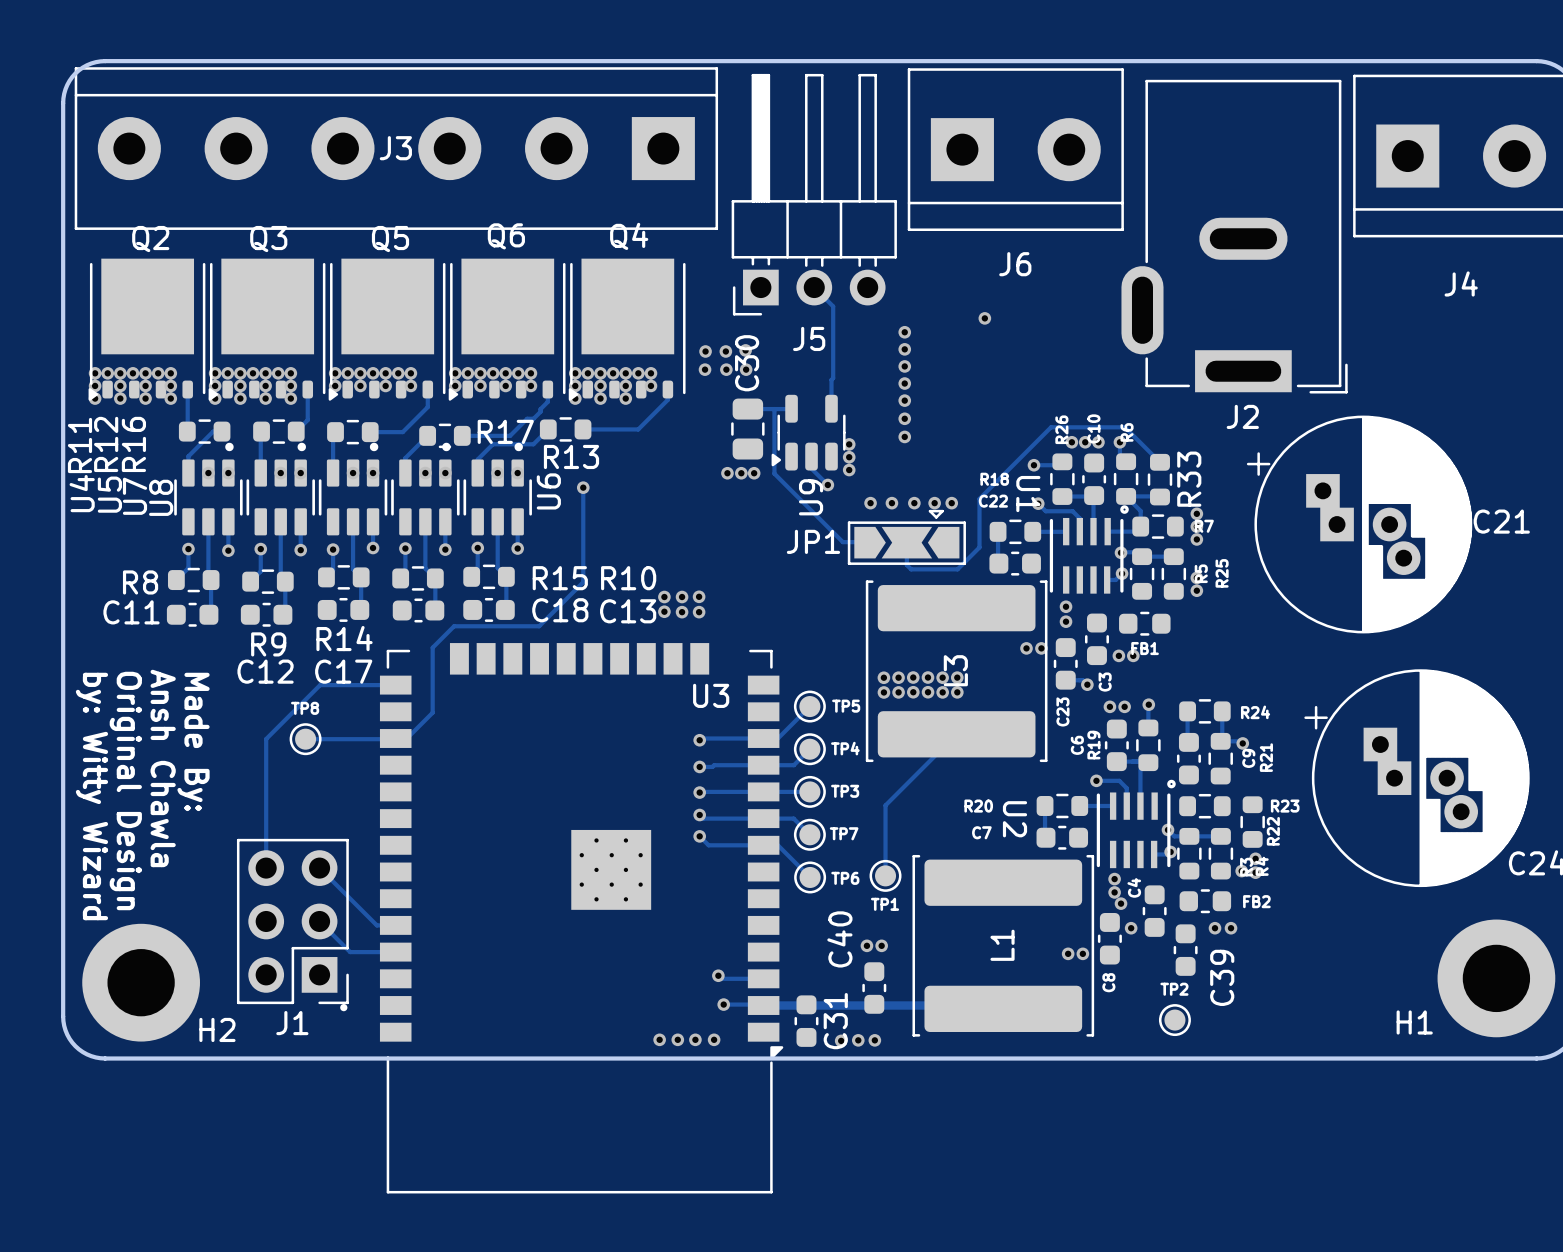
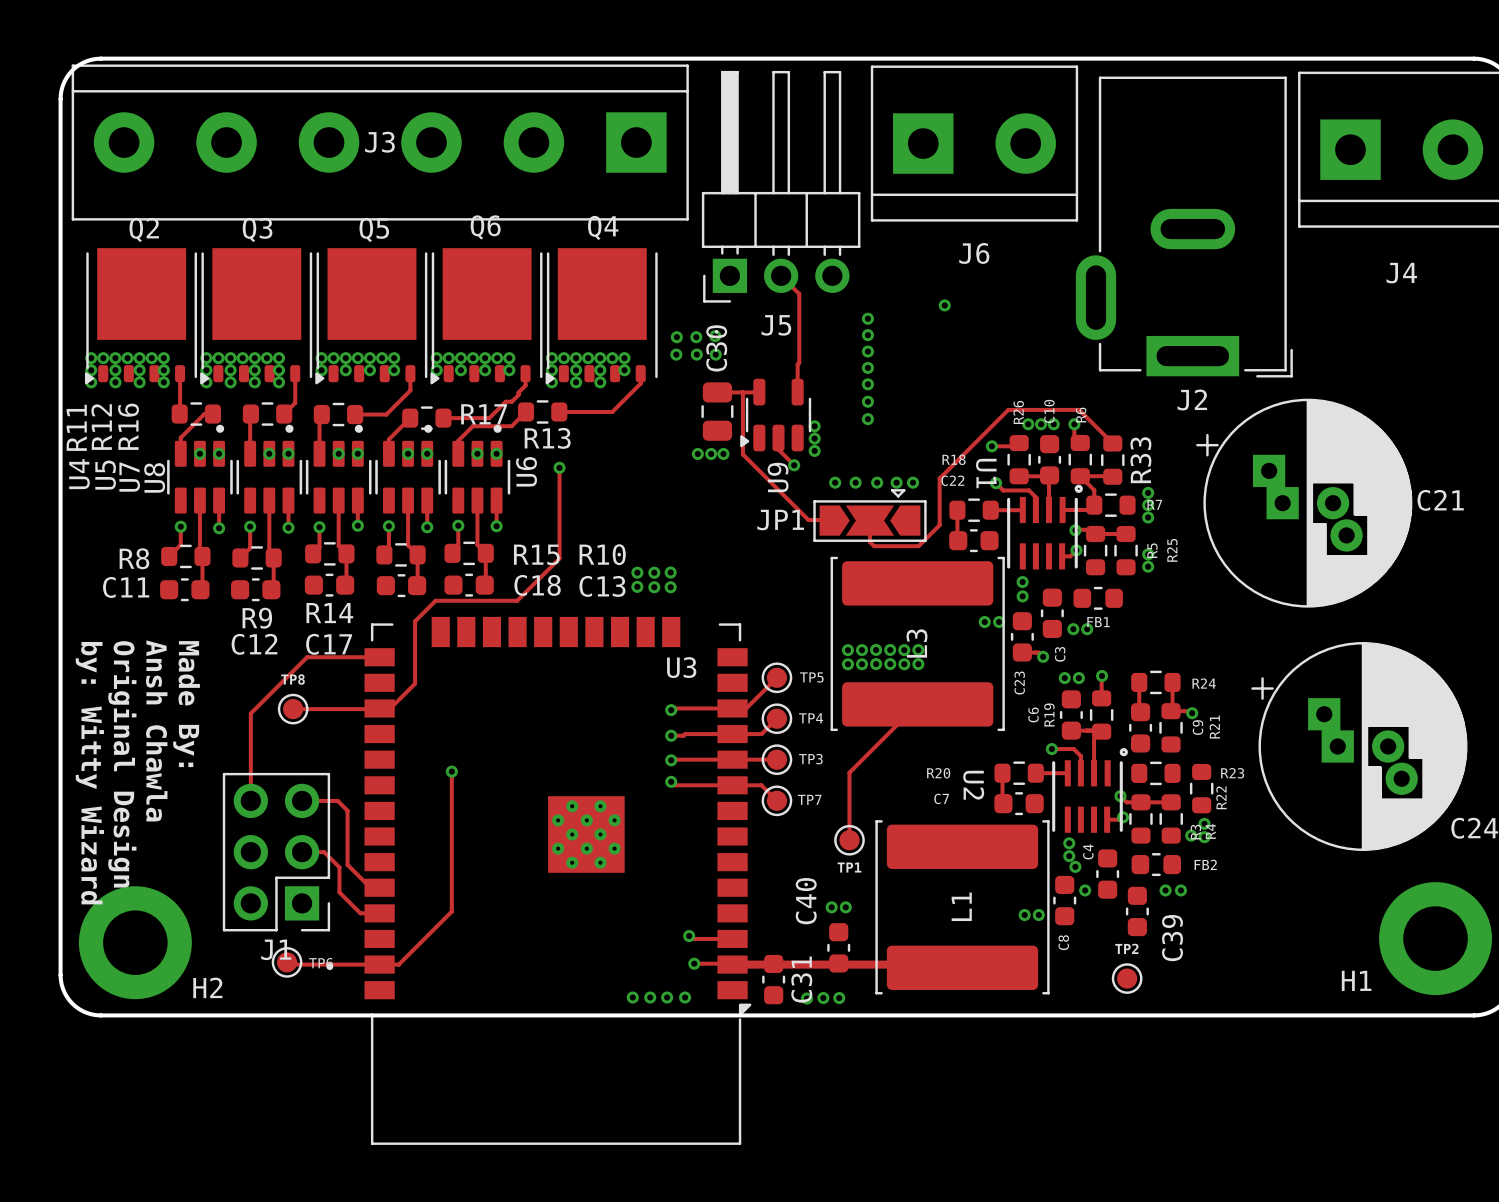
track: (266, 739) (266, 868) -> (255, 709) (250, 713) (250, 800)
track: none -> (451, 771) (451, 911) (398, 964) (289, 964) (287, 962)
via: none -> (451, 771)
track: (699, 836) (708, 845) (777, 845) (810, 877) -> none
via: (699, 836) -> none
track: (319, 868) (376, 925) (386, 925) -> (302, 800) (337, 800) (347, 810) (347, 864) (370, 887)
TP6 position: (810, 877) -> (287, 962)
J1 position: (292, 921) -> (276, 852)
track: (319, 921) (350, 952) (375, 952) -> (302, 852) (324, 852) (339, 867) (339, 892) (360, 913)

